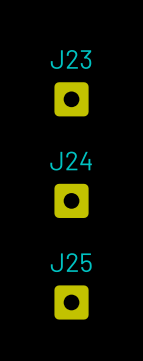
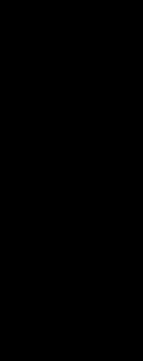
J23: (71, 99) -> none
J24: (71, 200) -> none
J25: (71, 302) -> none

